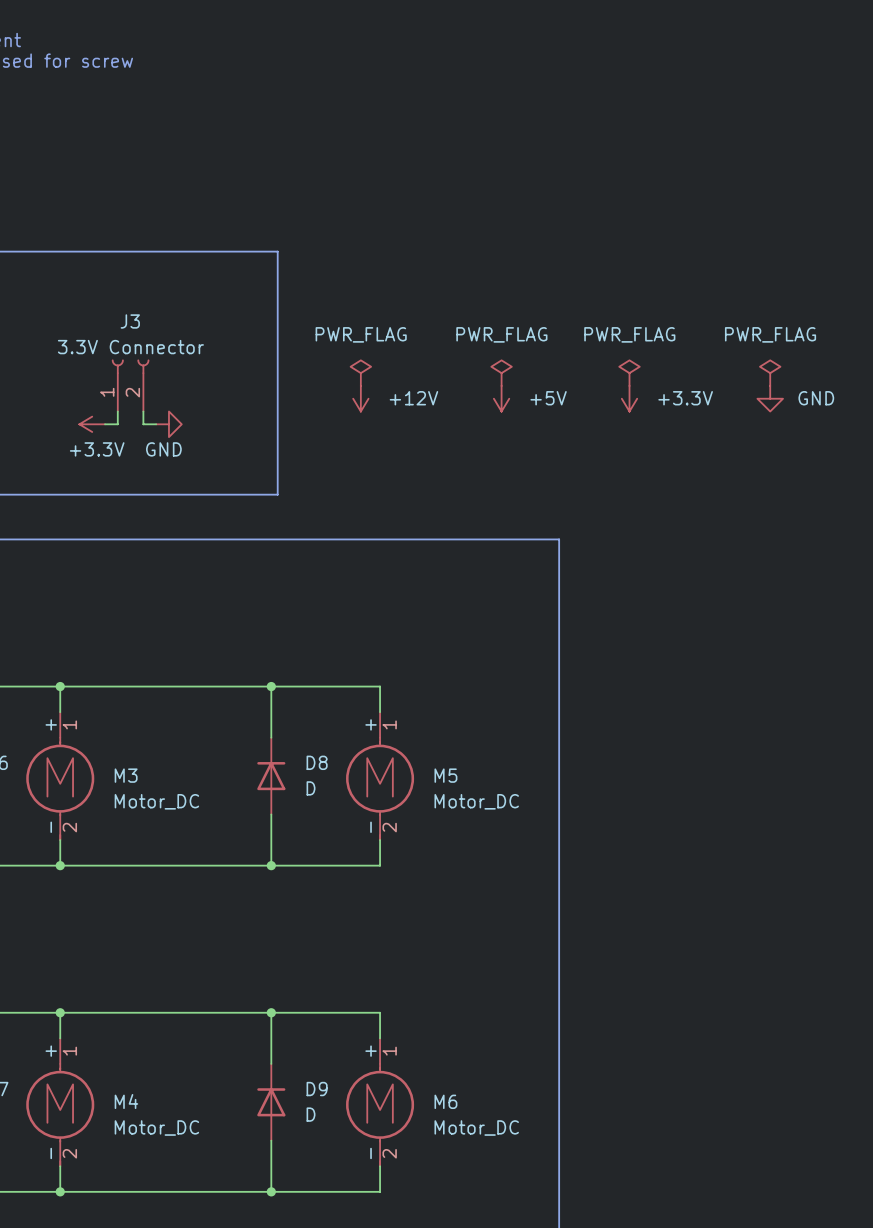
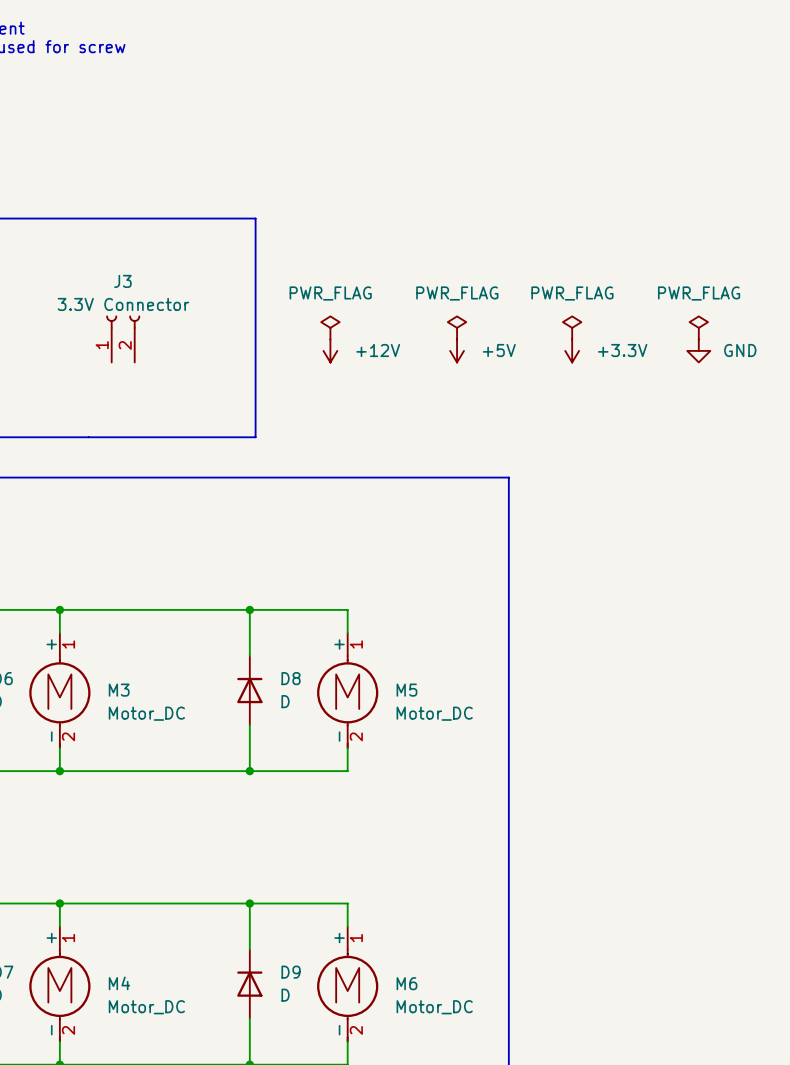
wire: (117, 411) (117, 424) (105, 424) -> none
wire: (143, 411) (143, 424) (156, 424) -> none
power symbol: +3.3V (92, 424) -> none
power symbol: GND (168, 424) -> none

